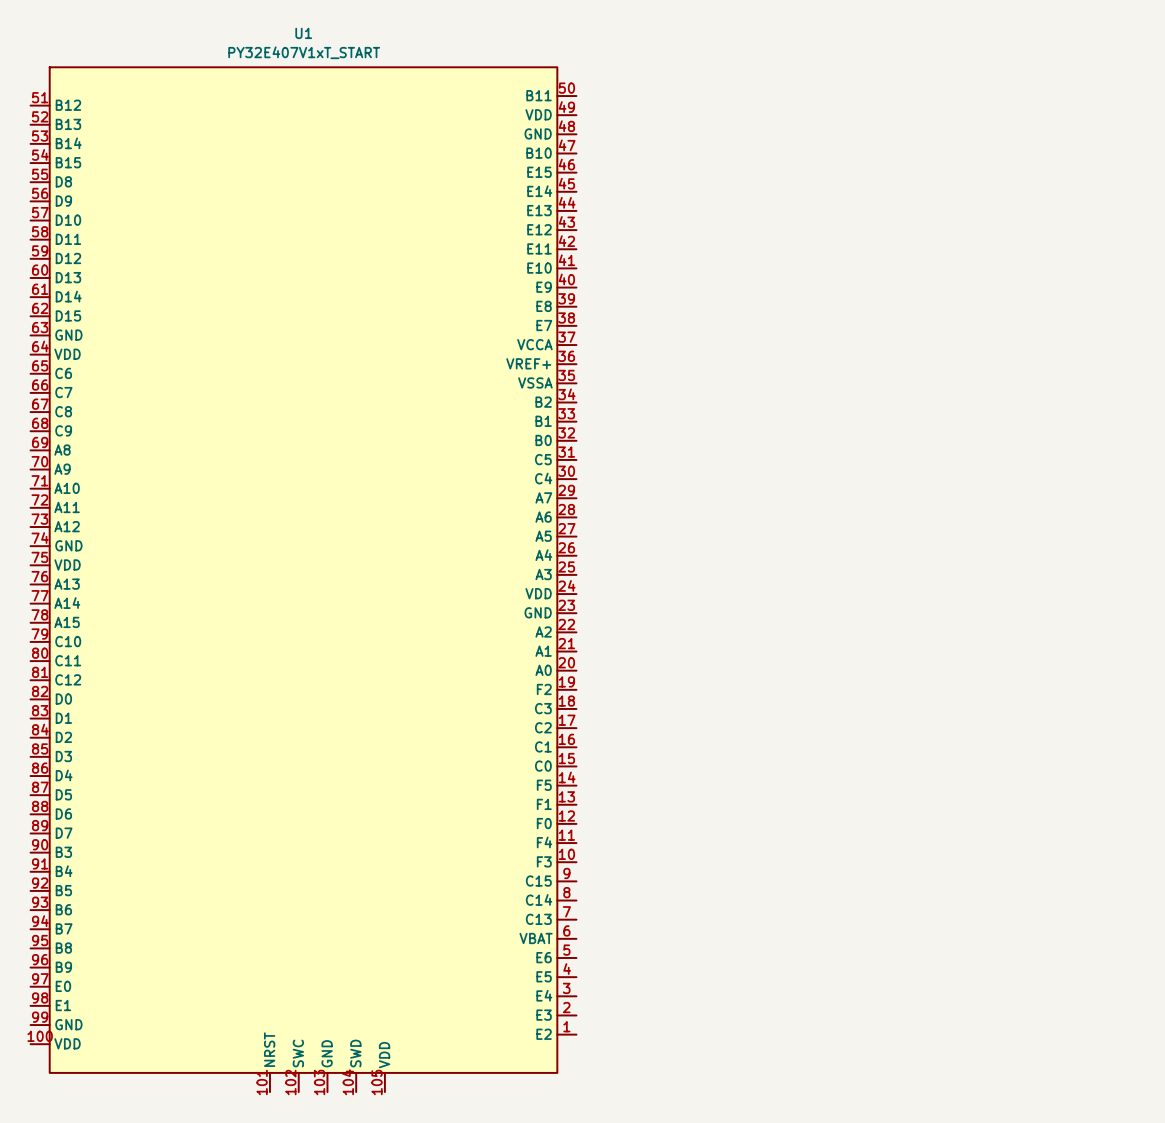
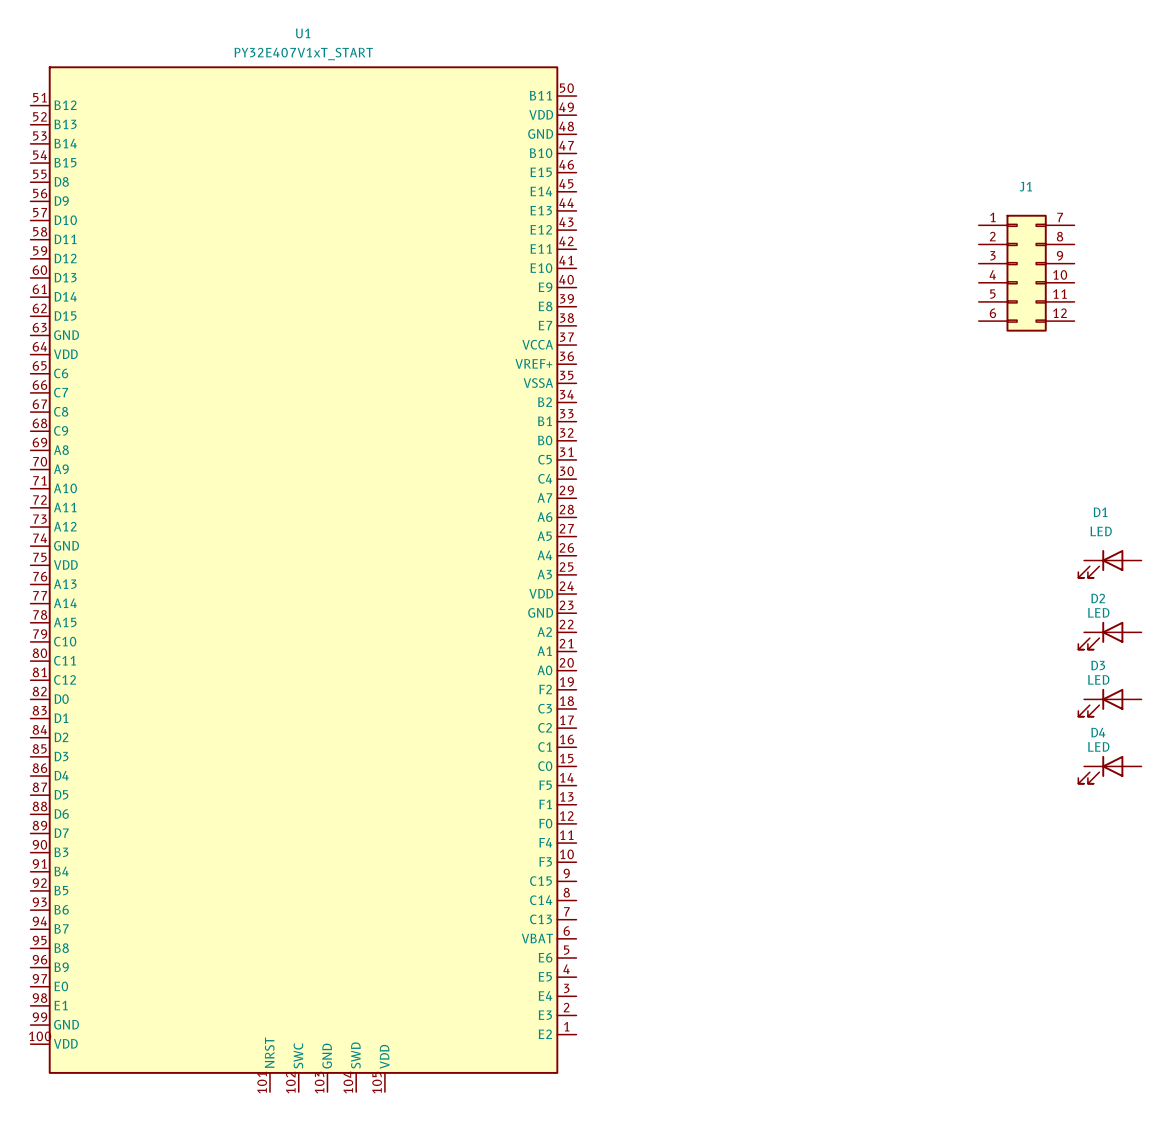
J1: none -> (1026, 273)
D1: none -> LED (1109, 563)
D2: none -> LED (1109, 635)
D3: none -> LED (1109, 702)
D4: none -> LED (1109, 769)

